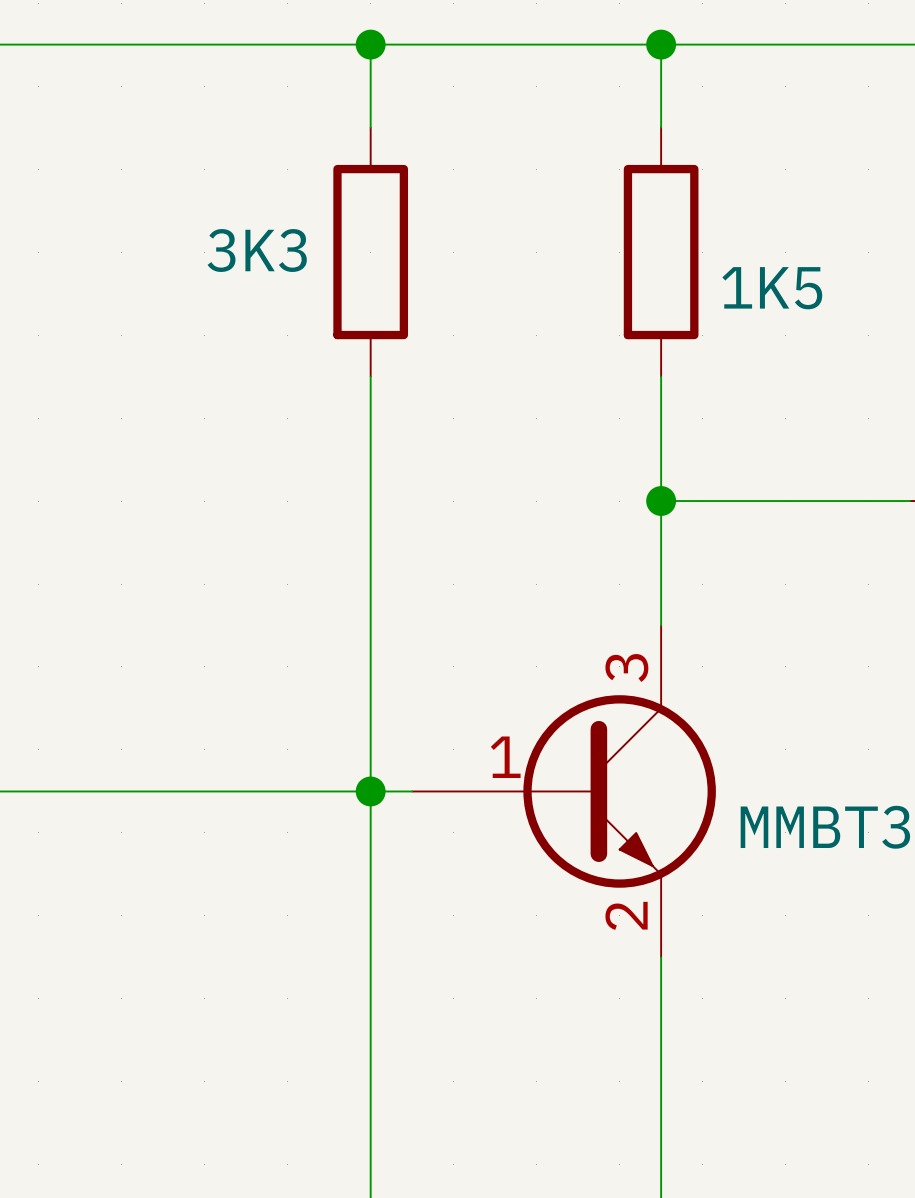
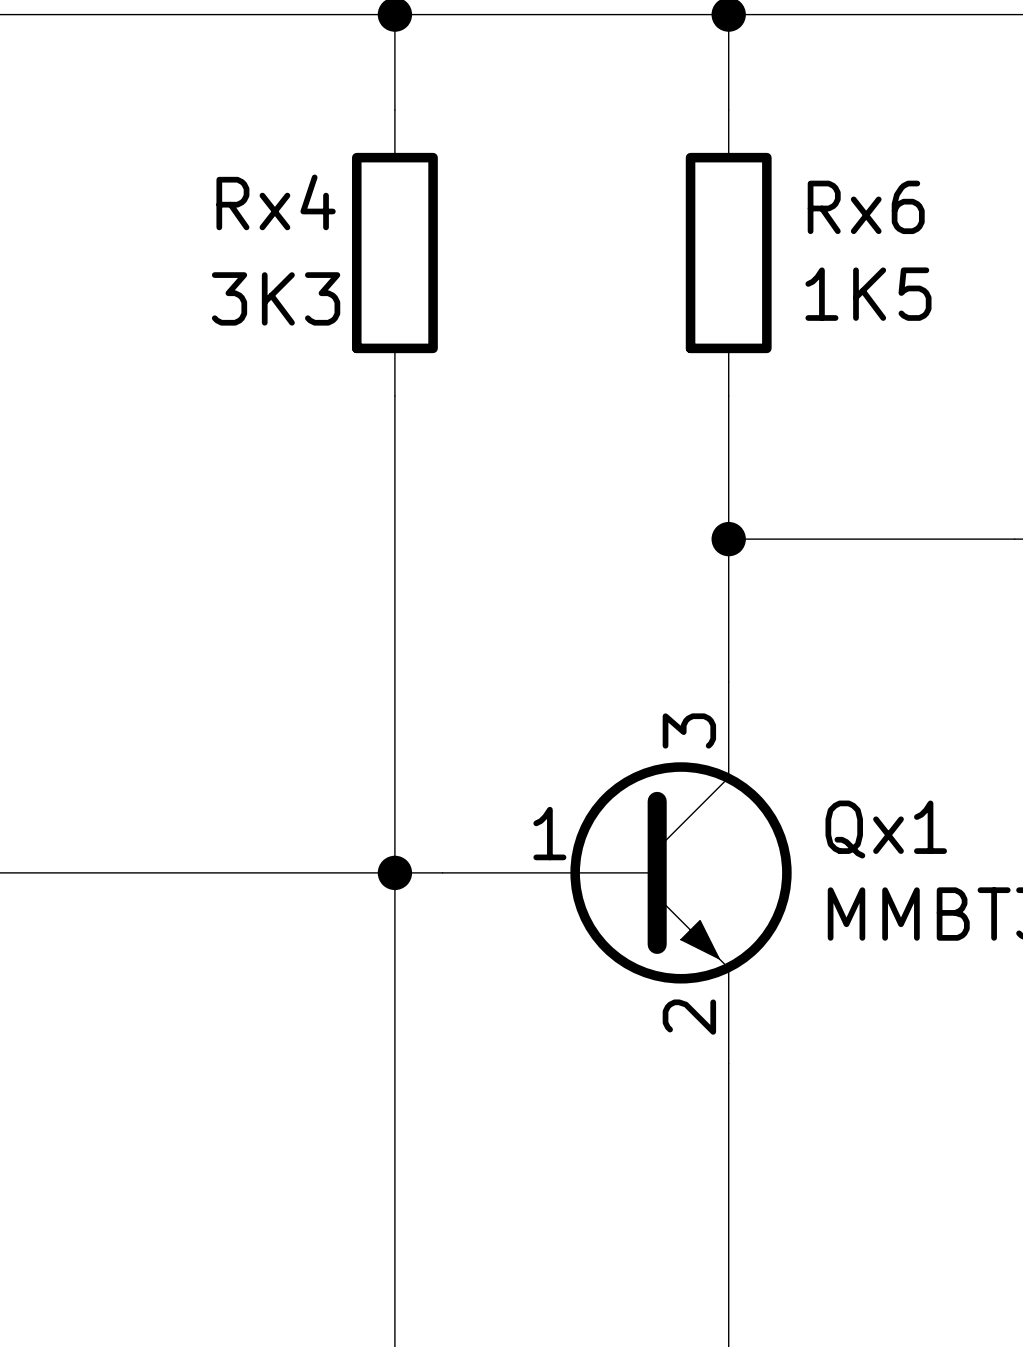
Rx4 name: none -> Rx4 (276, 202)
Rx6 name: none -> Rx6 (866, 207)
Rx4 value position: 3K3 (257, 250) -> 3K3 (276, 298)
Qx1 name: none -> Qx1 (886, 829)

